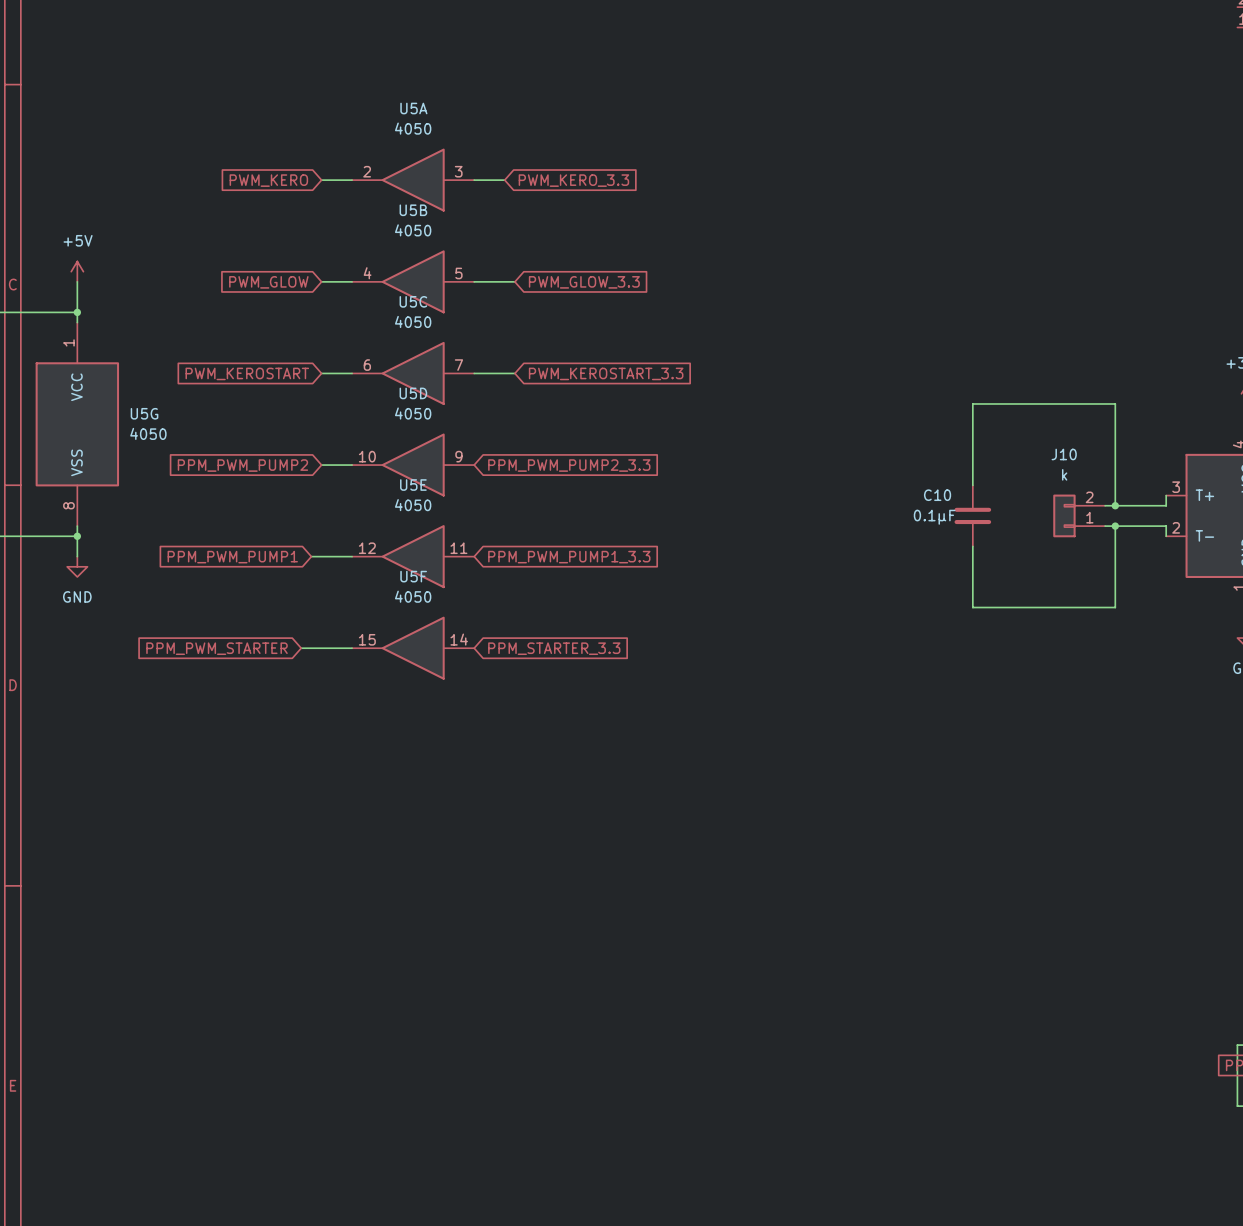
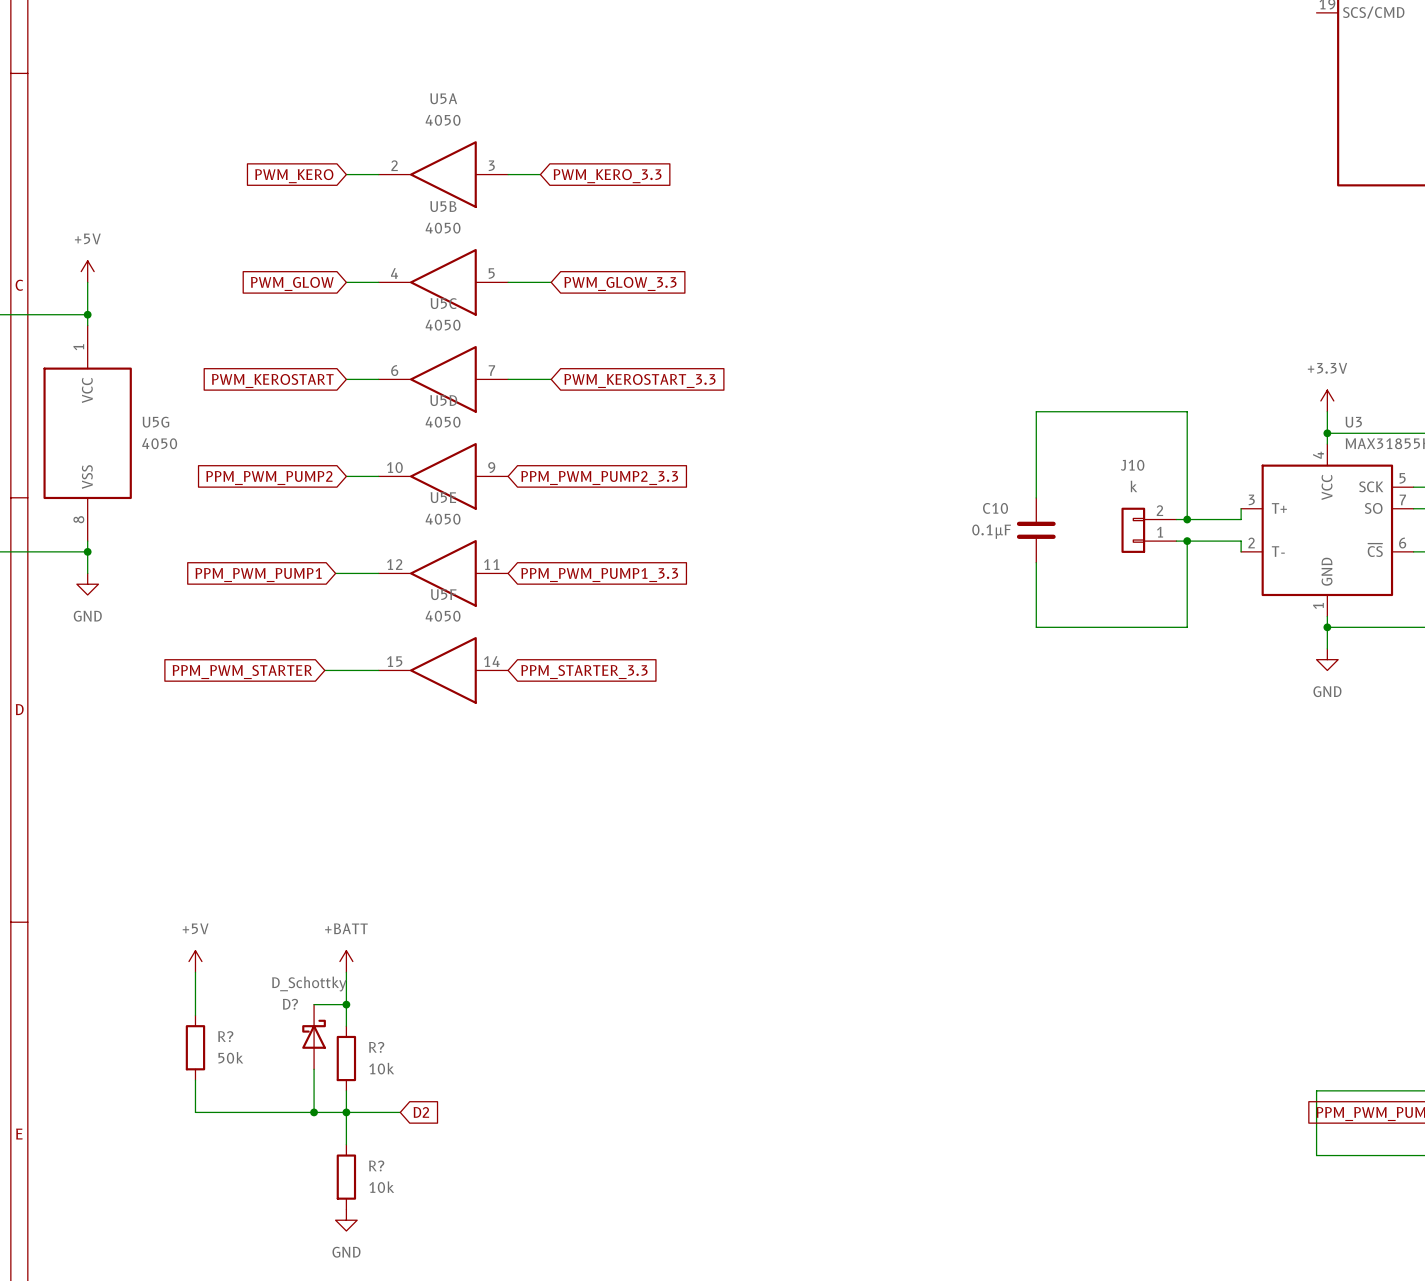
power symbol: none -> +5V (195, 961)
power symbol: none -> +BATT (346, 961)
wire: none -> (195, 972) (195, 1015)
wire: none -> (346, 972) (346, 1026)
wire: none -> (314, 1004) (346, 1004)
junction: none -> (346, 1004)
D?: none -> D_Schottky (314, 1036)
R?: none -> 50k (195, 1047)
R?: none -> 10k (346, 1058)
wire: none -> (314, 1069) (314, 1112)
wire: none -> (195, 1080) (195, 1112) (400, 1112)
wire: none -> (346, 1090) (346, 1144)
junction: none -> (314, 1112)
junction: none -> (346, 1112)
global label: none -> D2 (421, 1112)
R?: none -> 10k (346, 1177)
power symbol: none -> GND (346, 1220)

